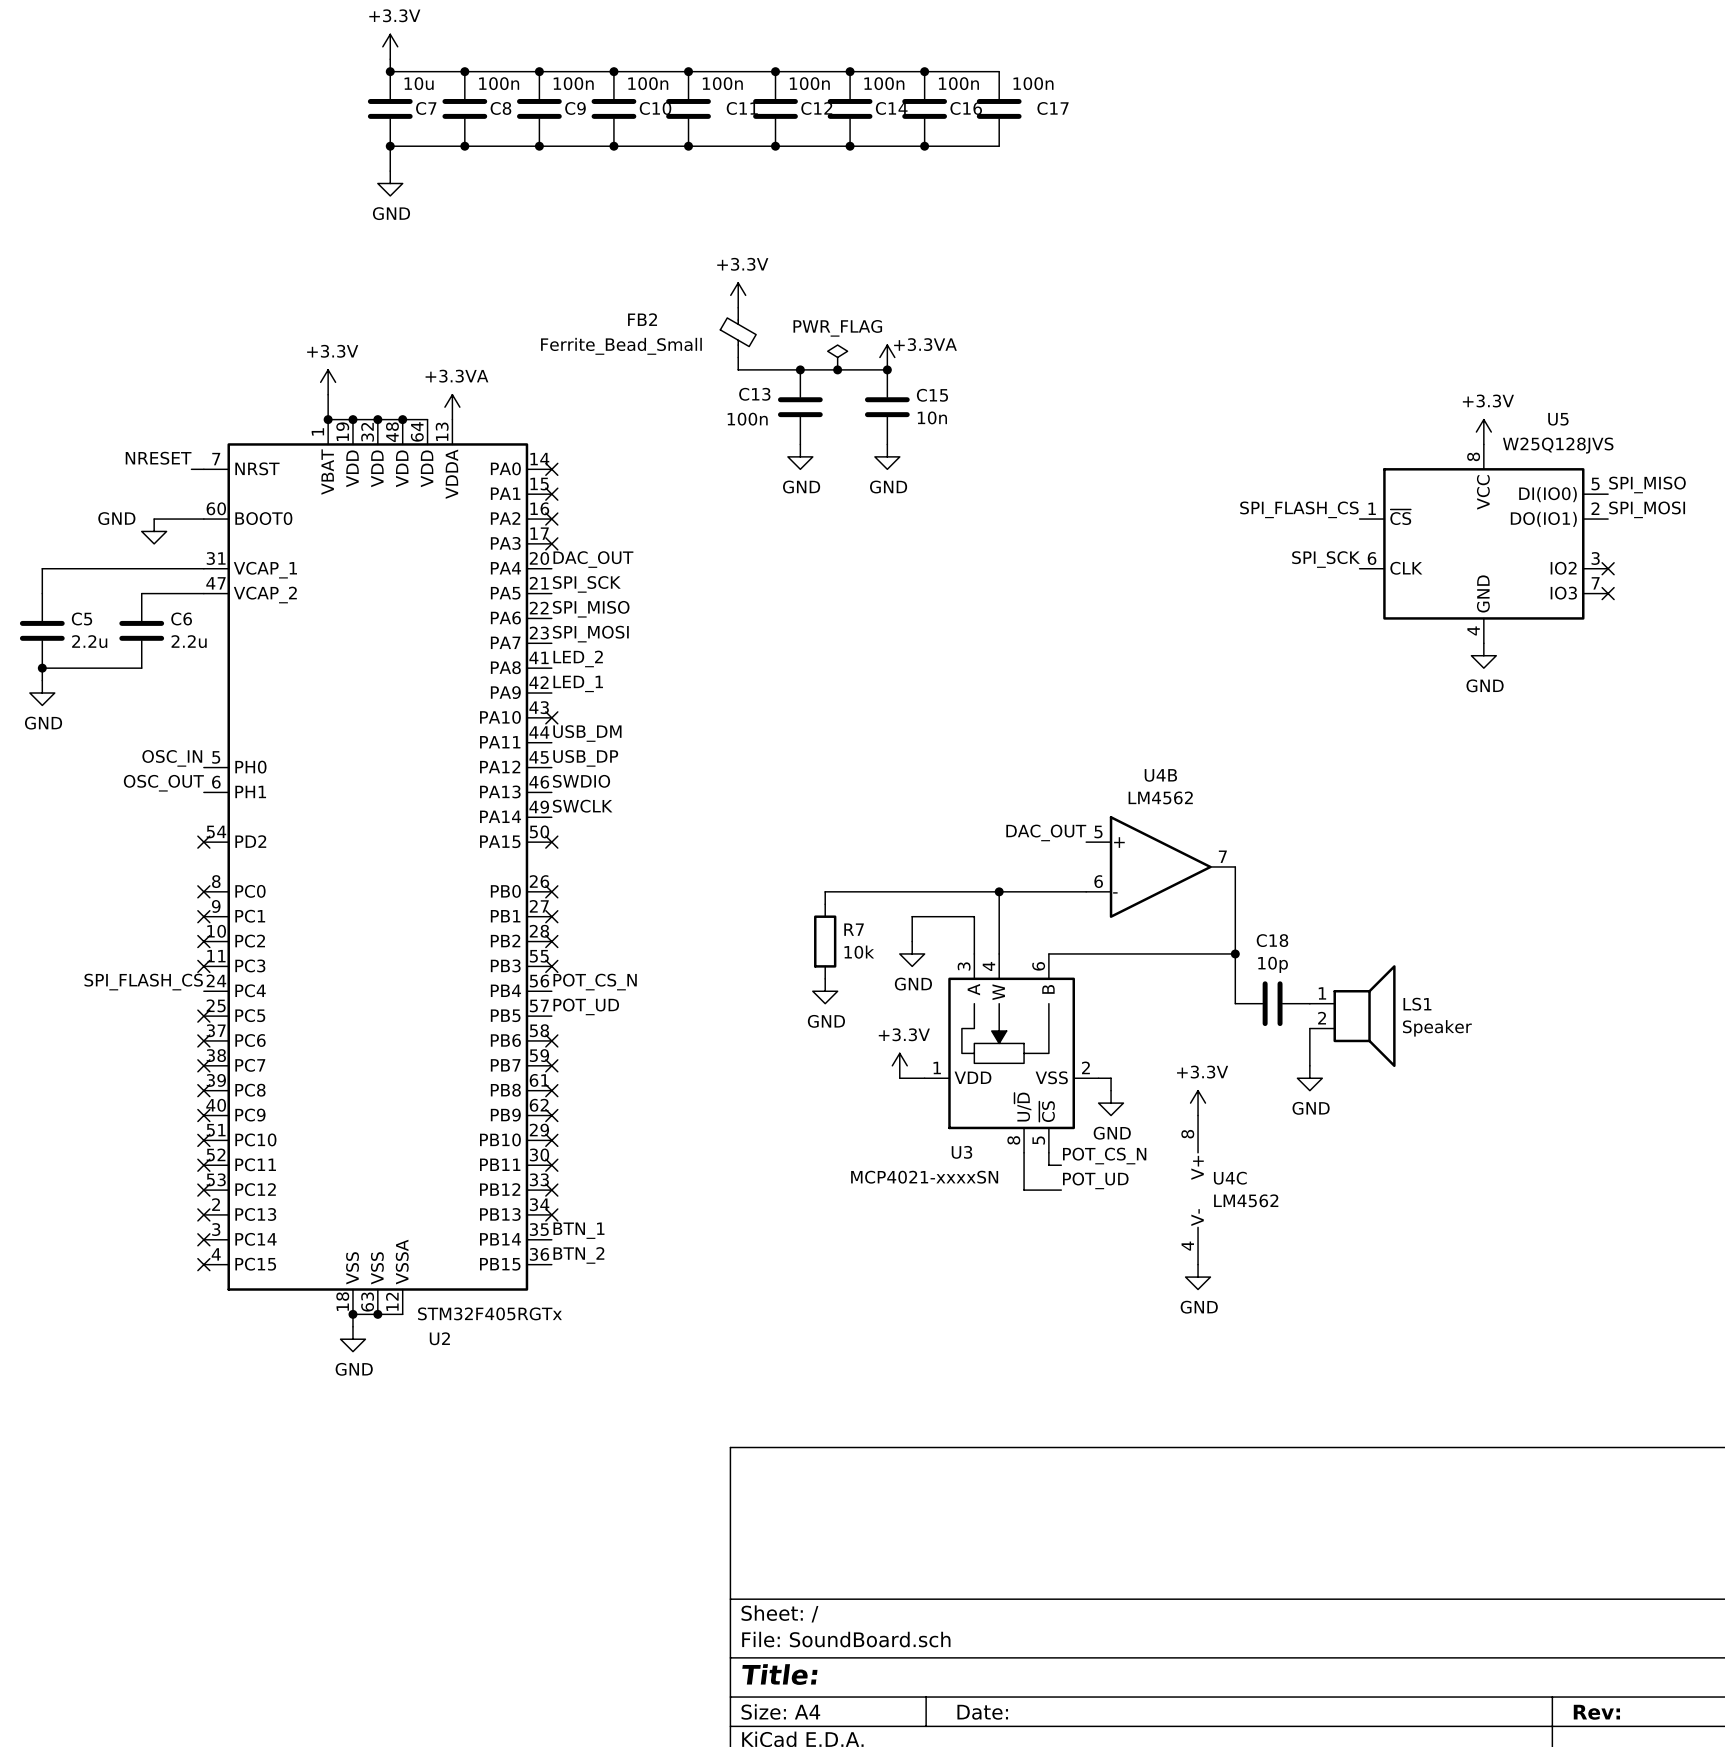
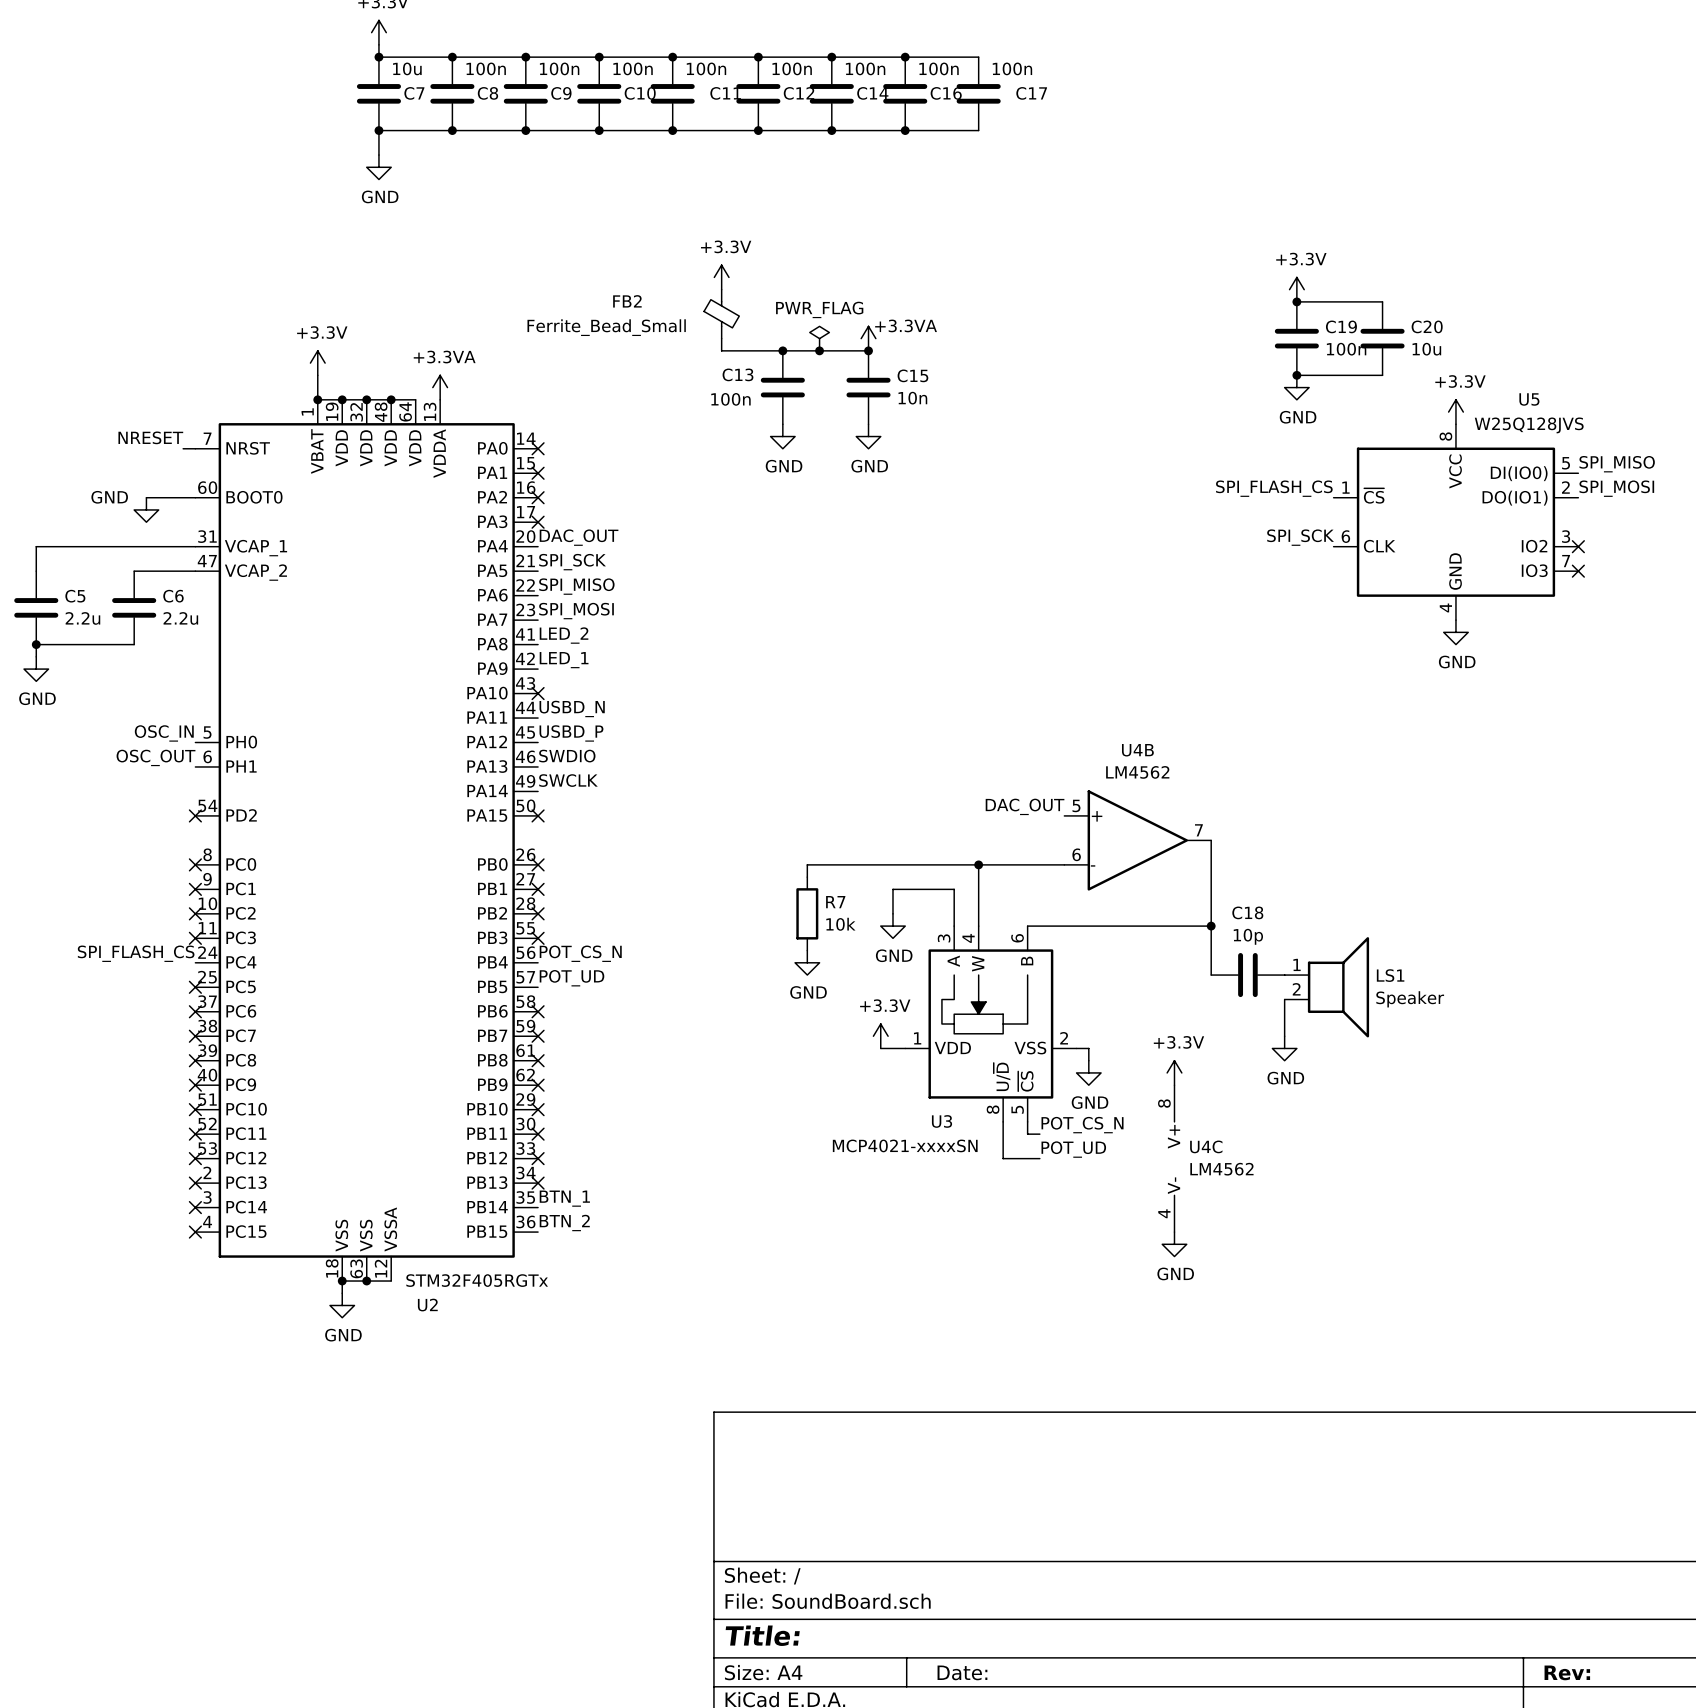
power symbol: none -> +3.3V (1296, 289)
wire: none -> (1296, 301) (1382, 301)
junction: none -> (1296, 301)
C19: none -> 100n (1296, 338)
C20: none -> 10u (1382, 338)
wire: none -> (1296, 375) (1382, 375)
junction: none -> (1296, 375)
power symbol: none -> GND (1296, 387)
label: USB_DM (587, 733) -> USBD_N (572, 708)
label: USB_DP (585, 758) -> USBD_P (571, 733)

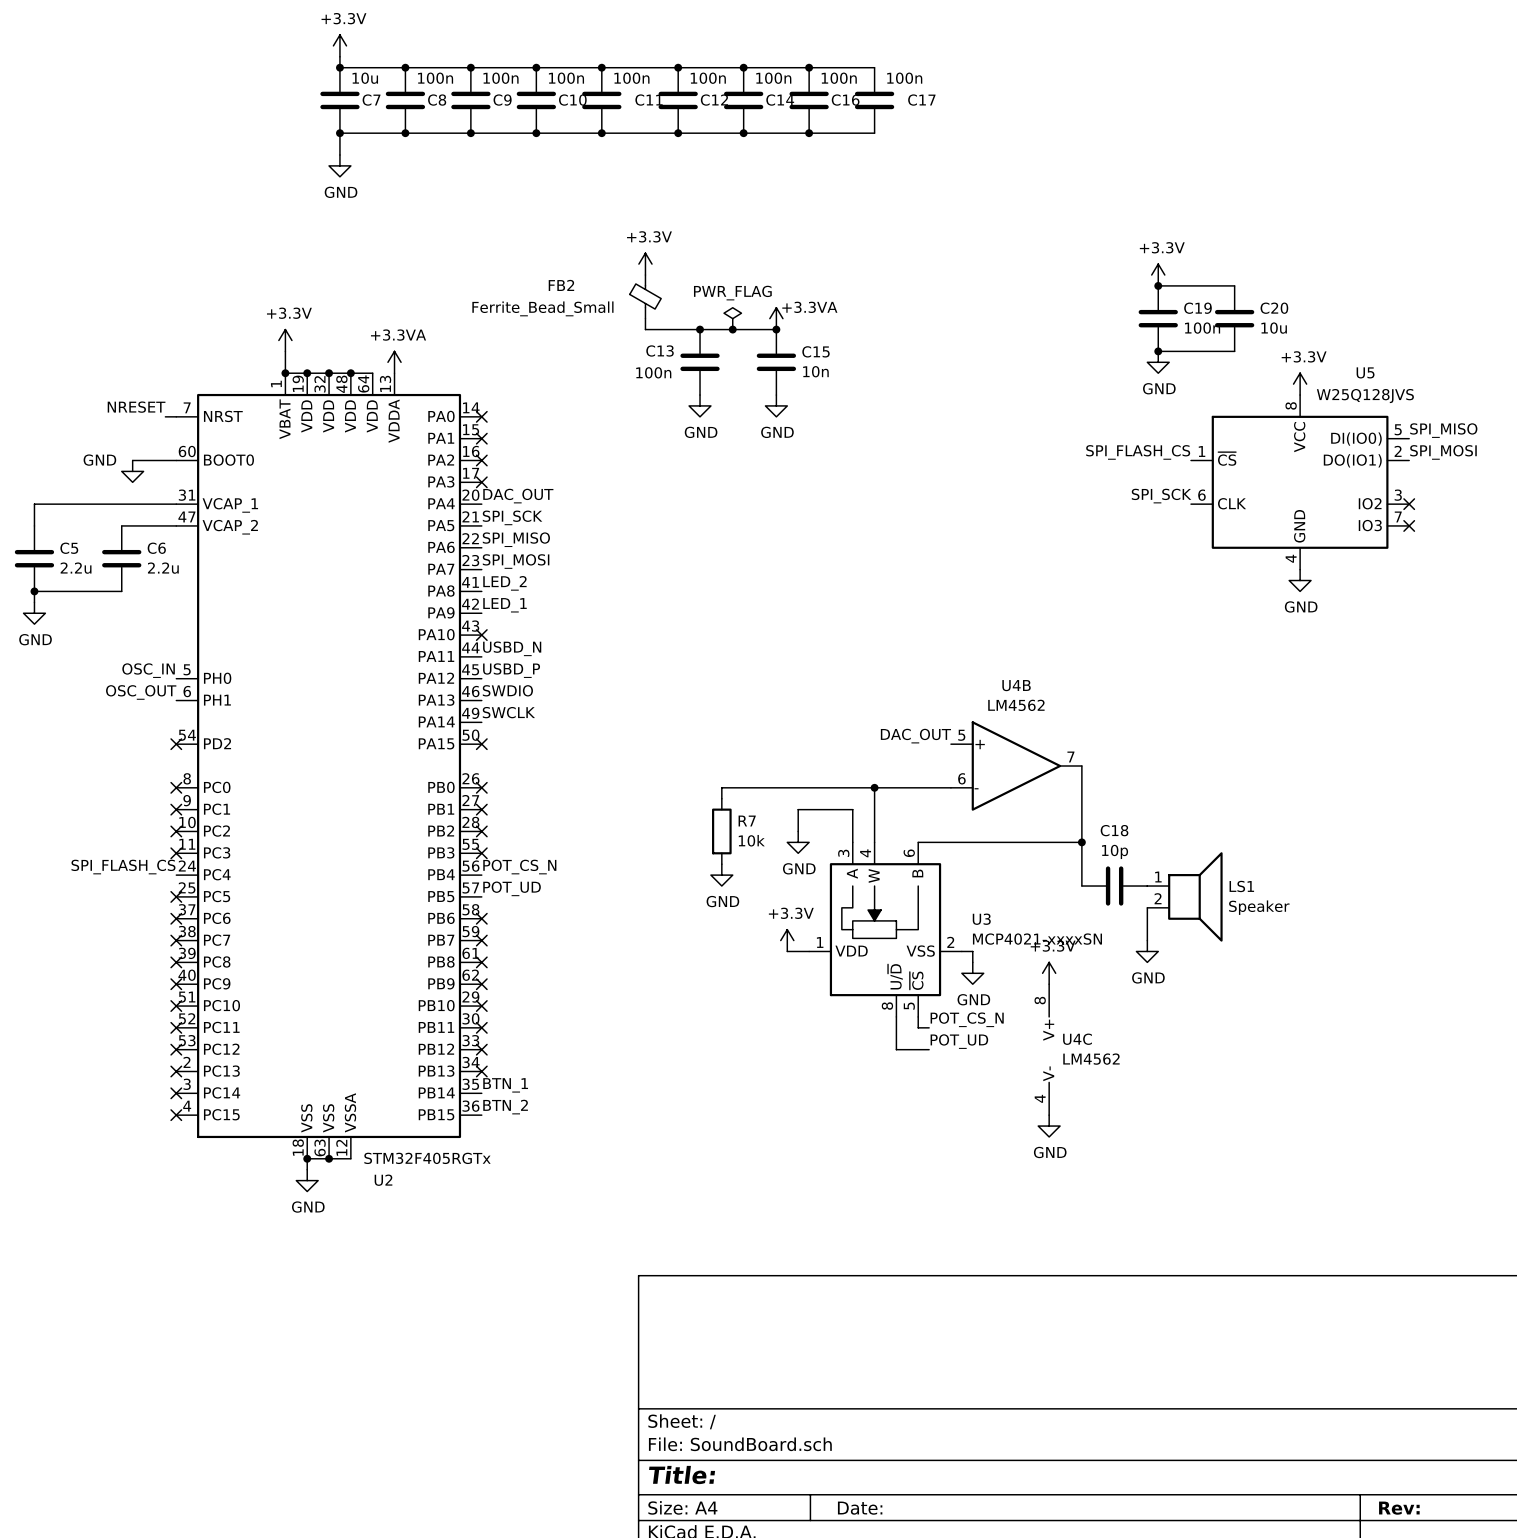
U3 name position: U3 (942, 1121) -> U3 (981, 919)
U3 value position: MCP4021-xxxxSN (905, 1145) -> MCP4021-xxxxSN (1037, 939)

